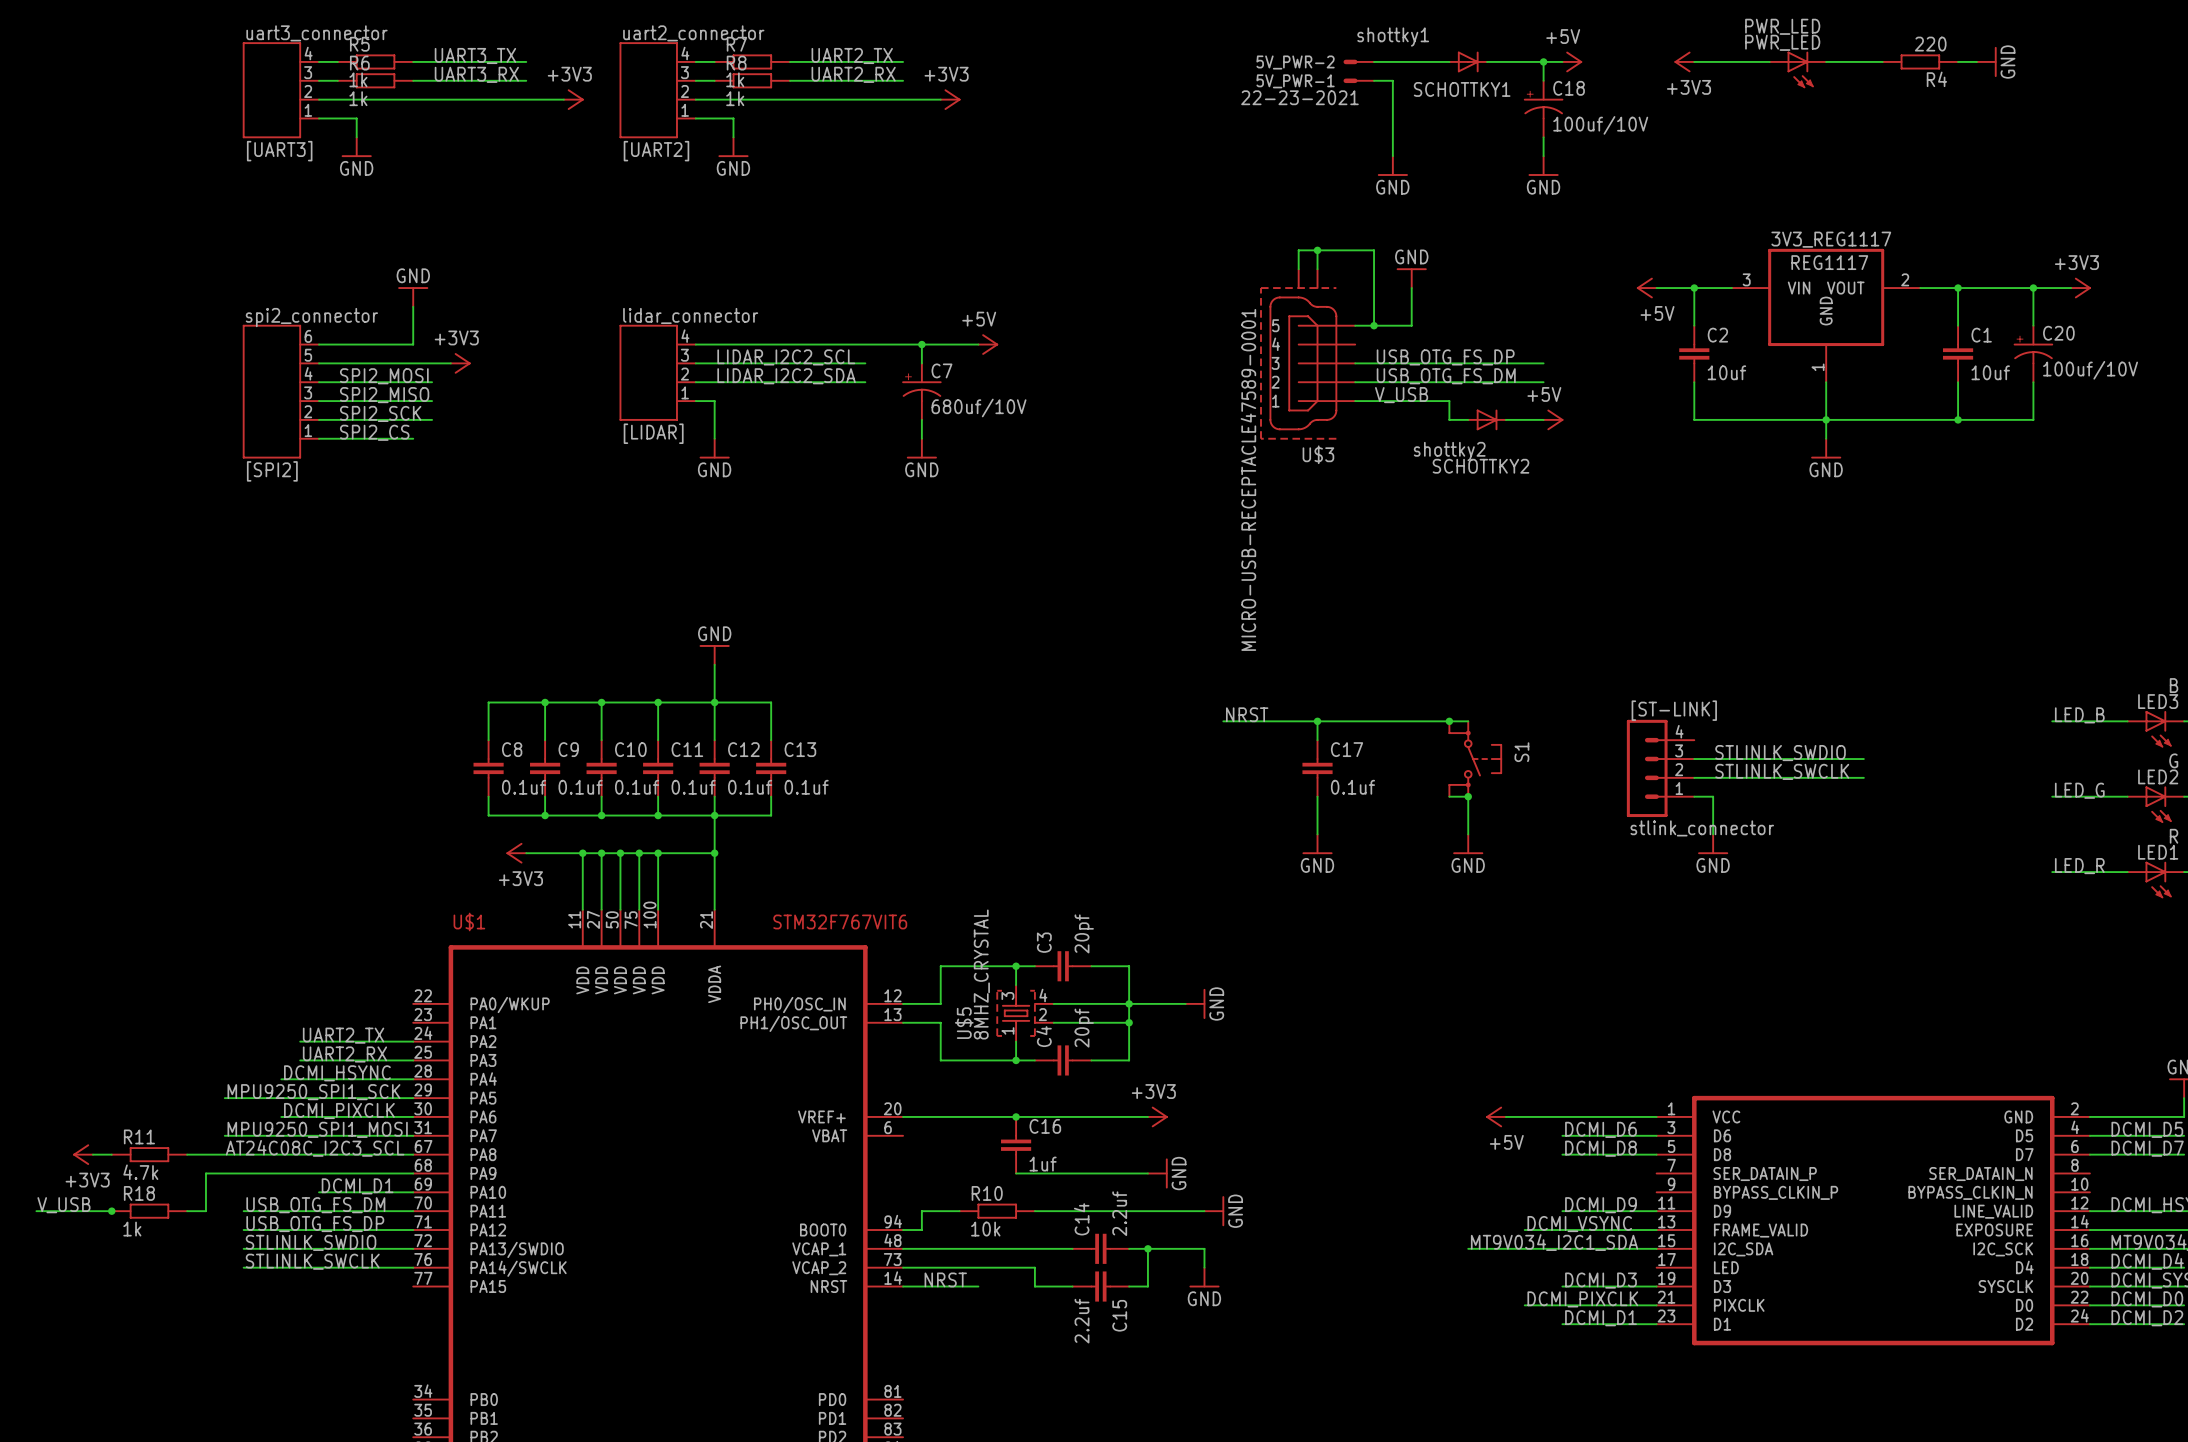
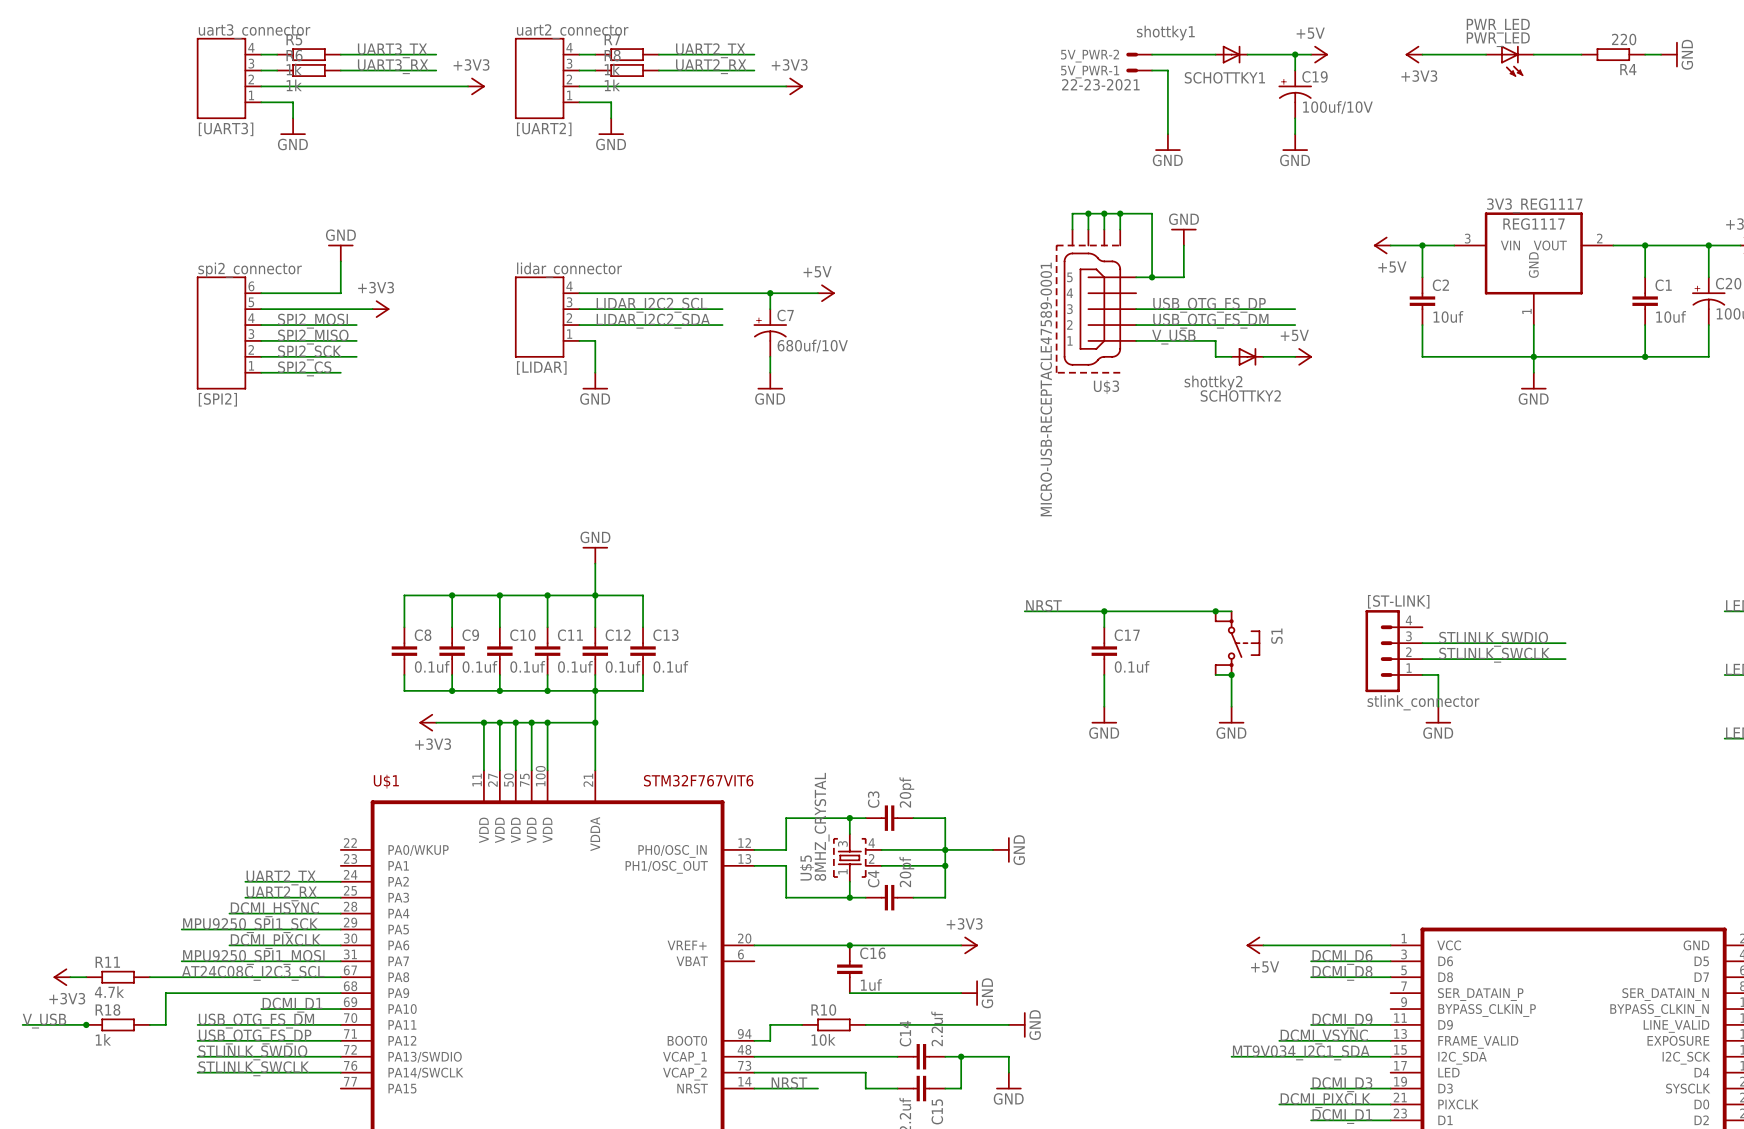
C18 name: C18 (1569, 88) -> C19 (1315, 76)
wire: none -> (1088, 213) (1072, 213) (1072, 229)
junction: none -> (1088, 213)
wire: none -> (1120, 213) (1120, 229)
junction: none -> (1120, 213)
U$3 symbol: [1260, 269, 1356, 440] -> [1055, 229, 1137, 374]

